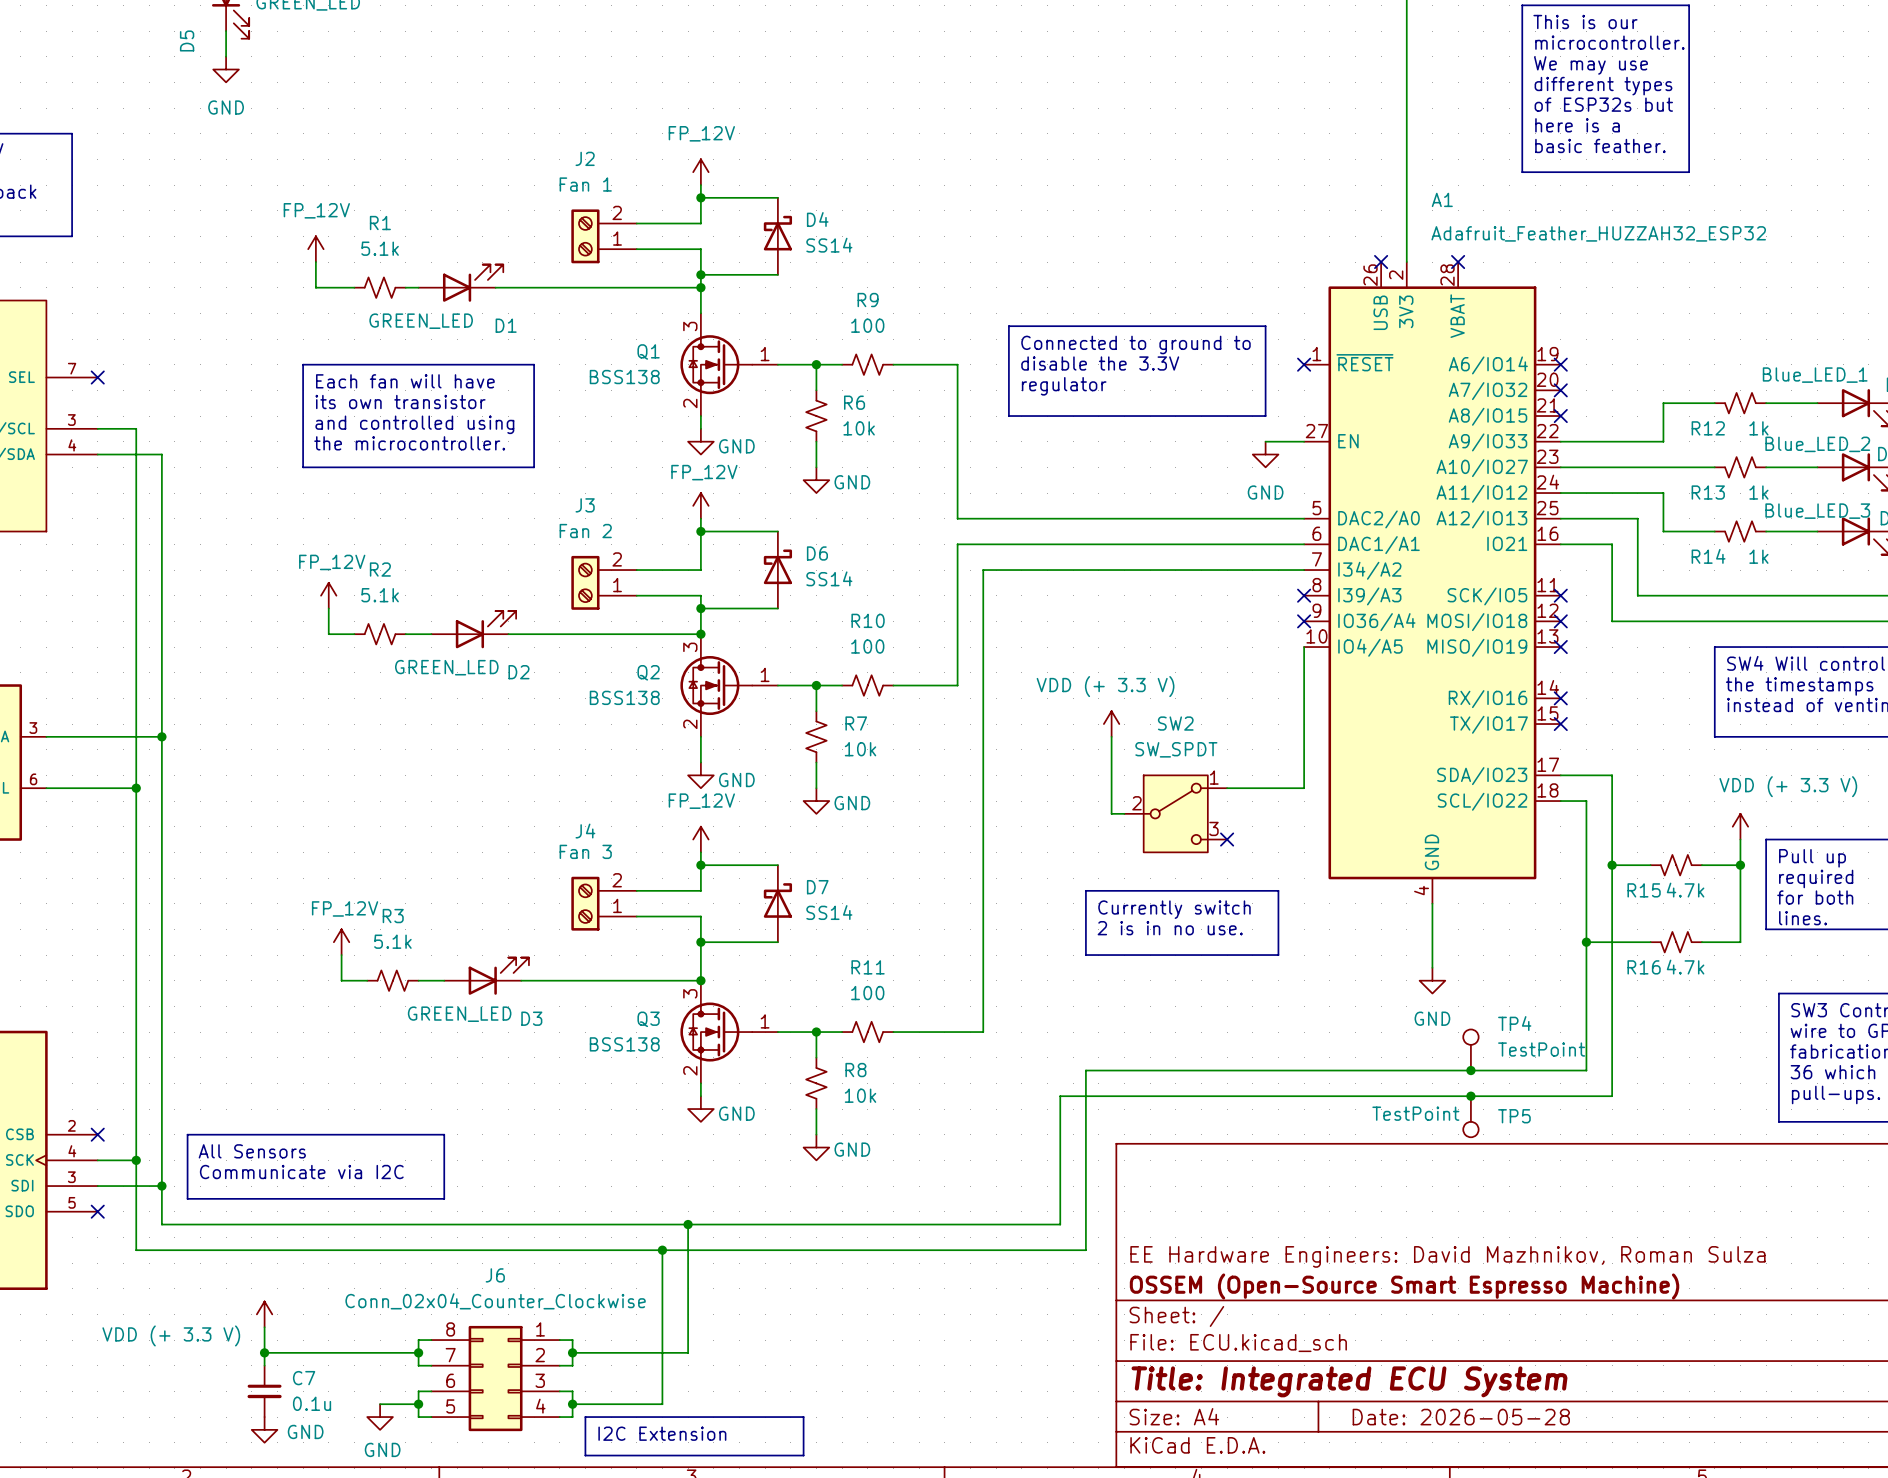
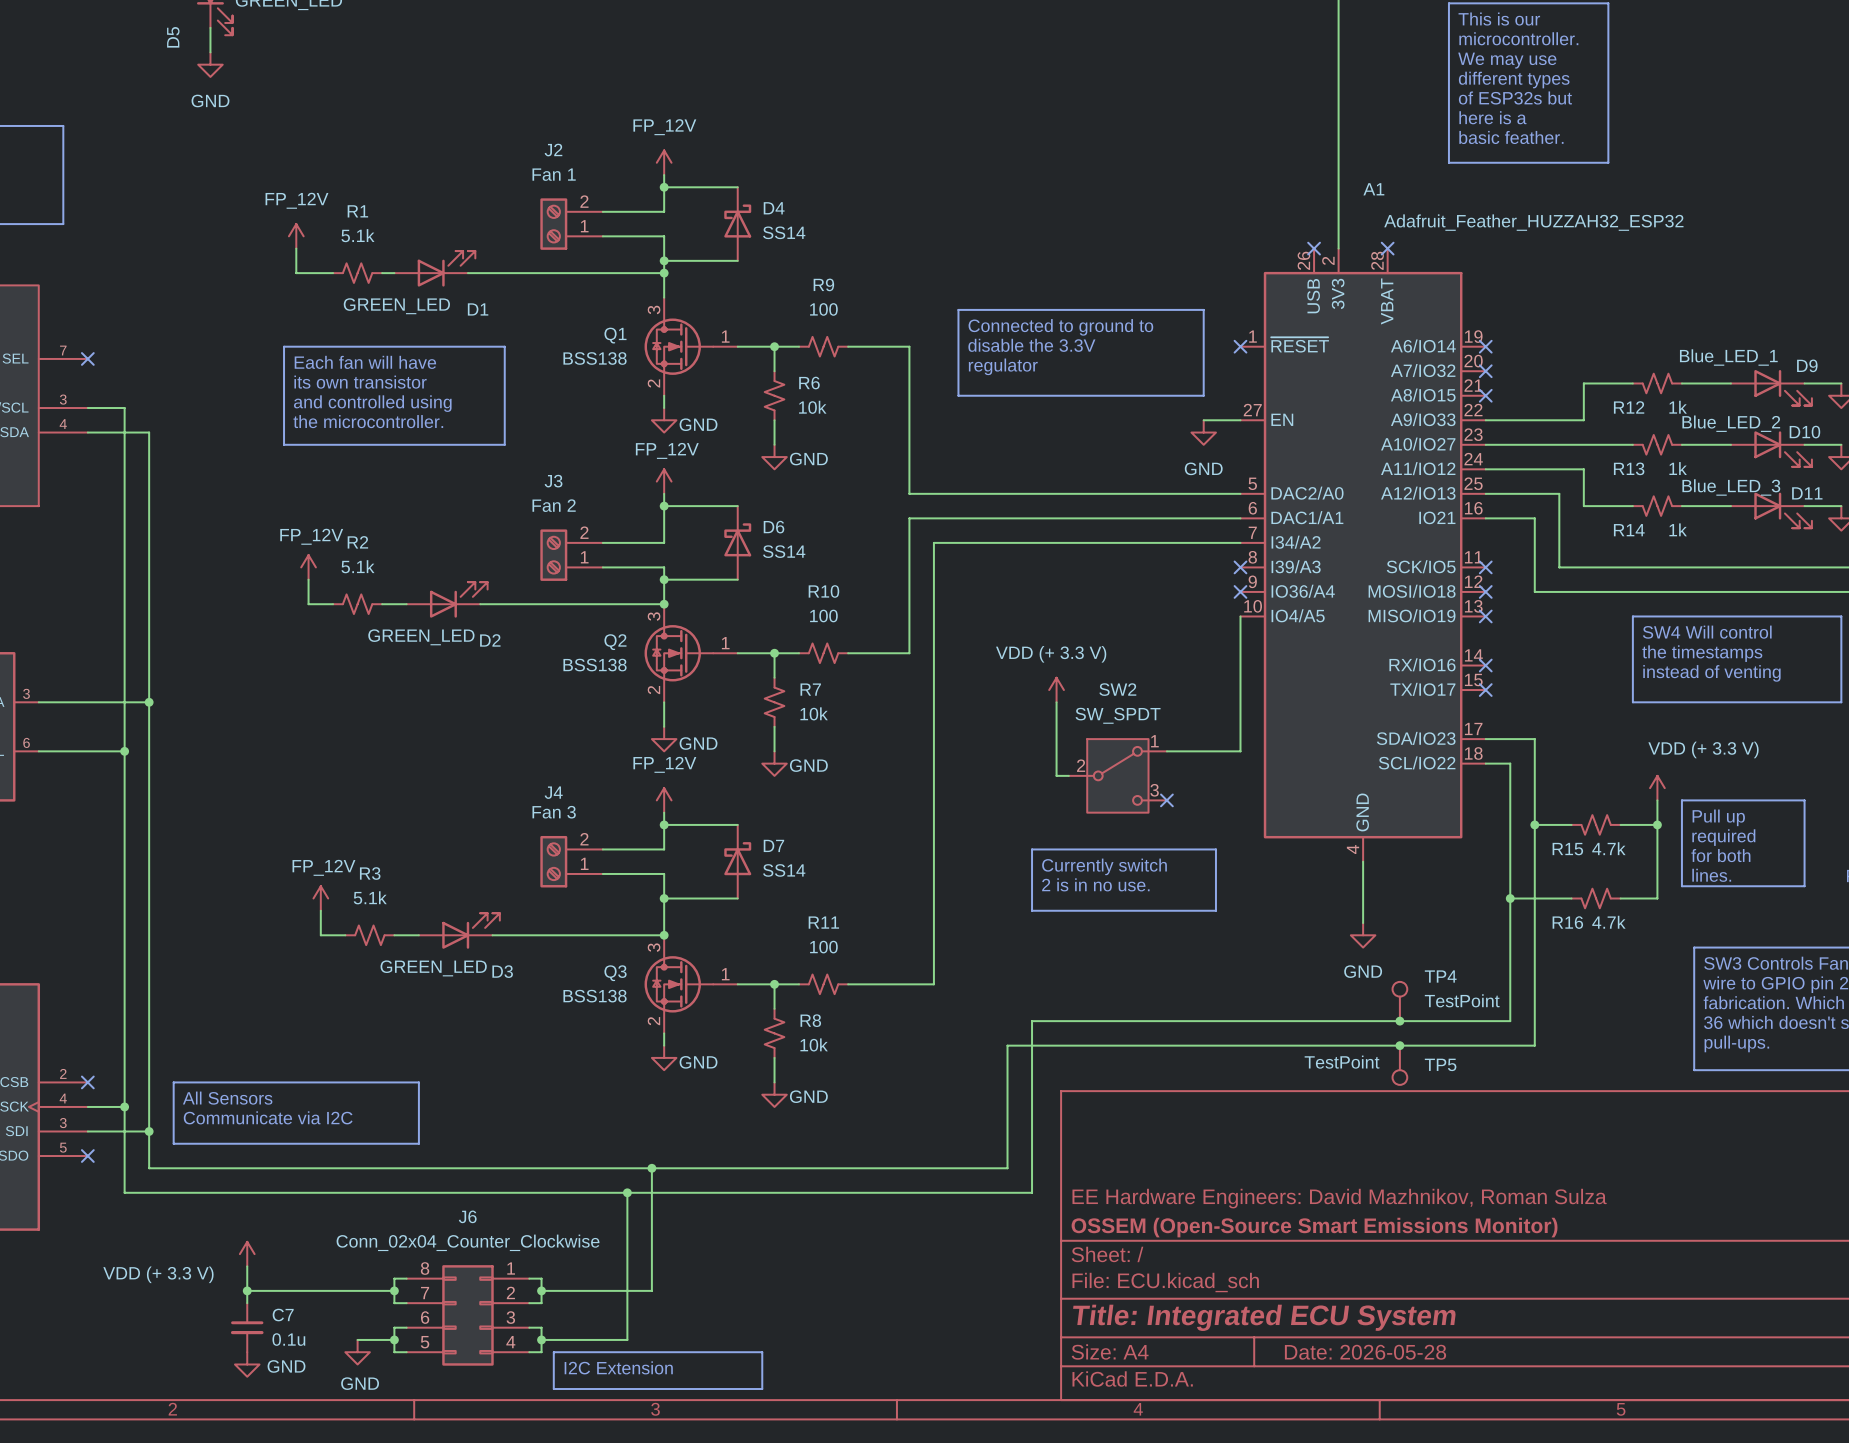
title block: OSSEM (Open-Source Smart Espresso Machine) (1404, 1286) -> OSSEM (Open-Source Smart Emissions Monitor) (1314, 1227)

